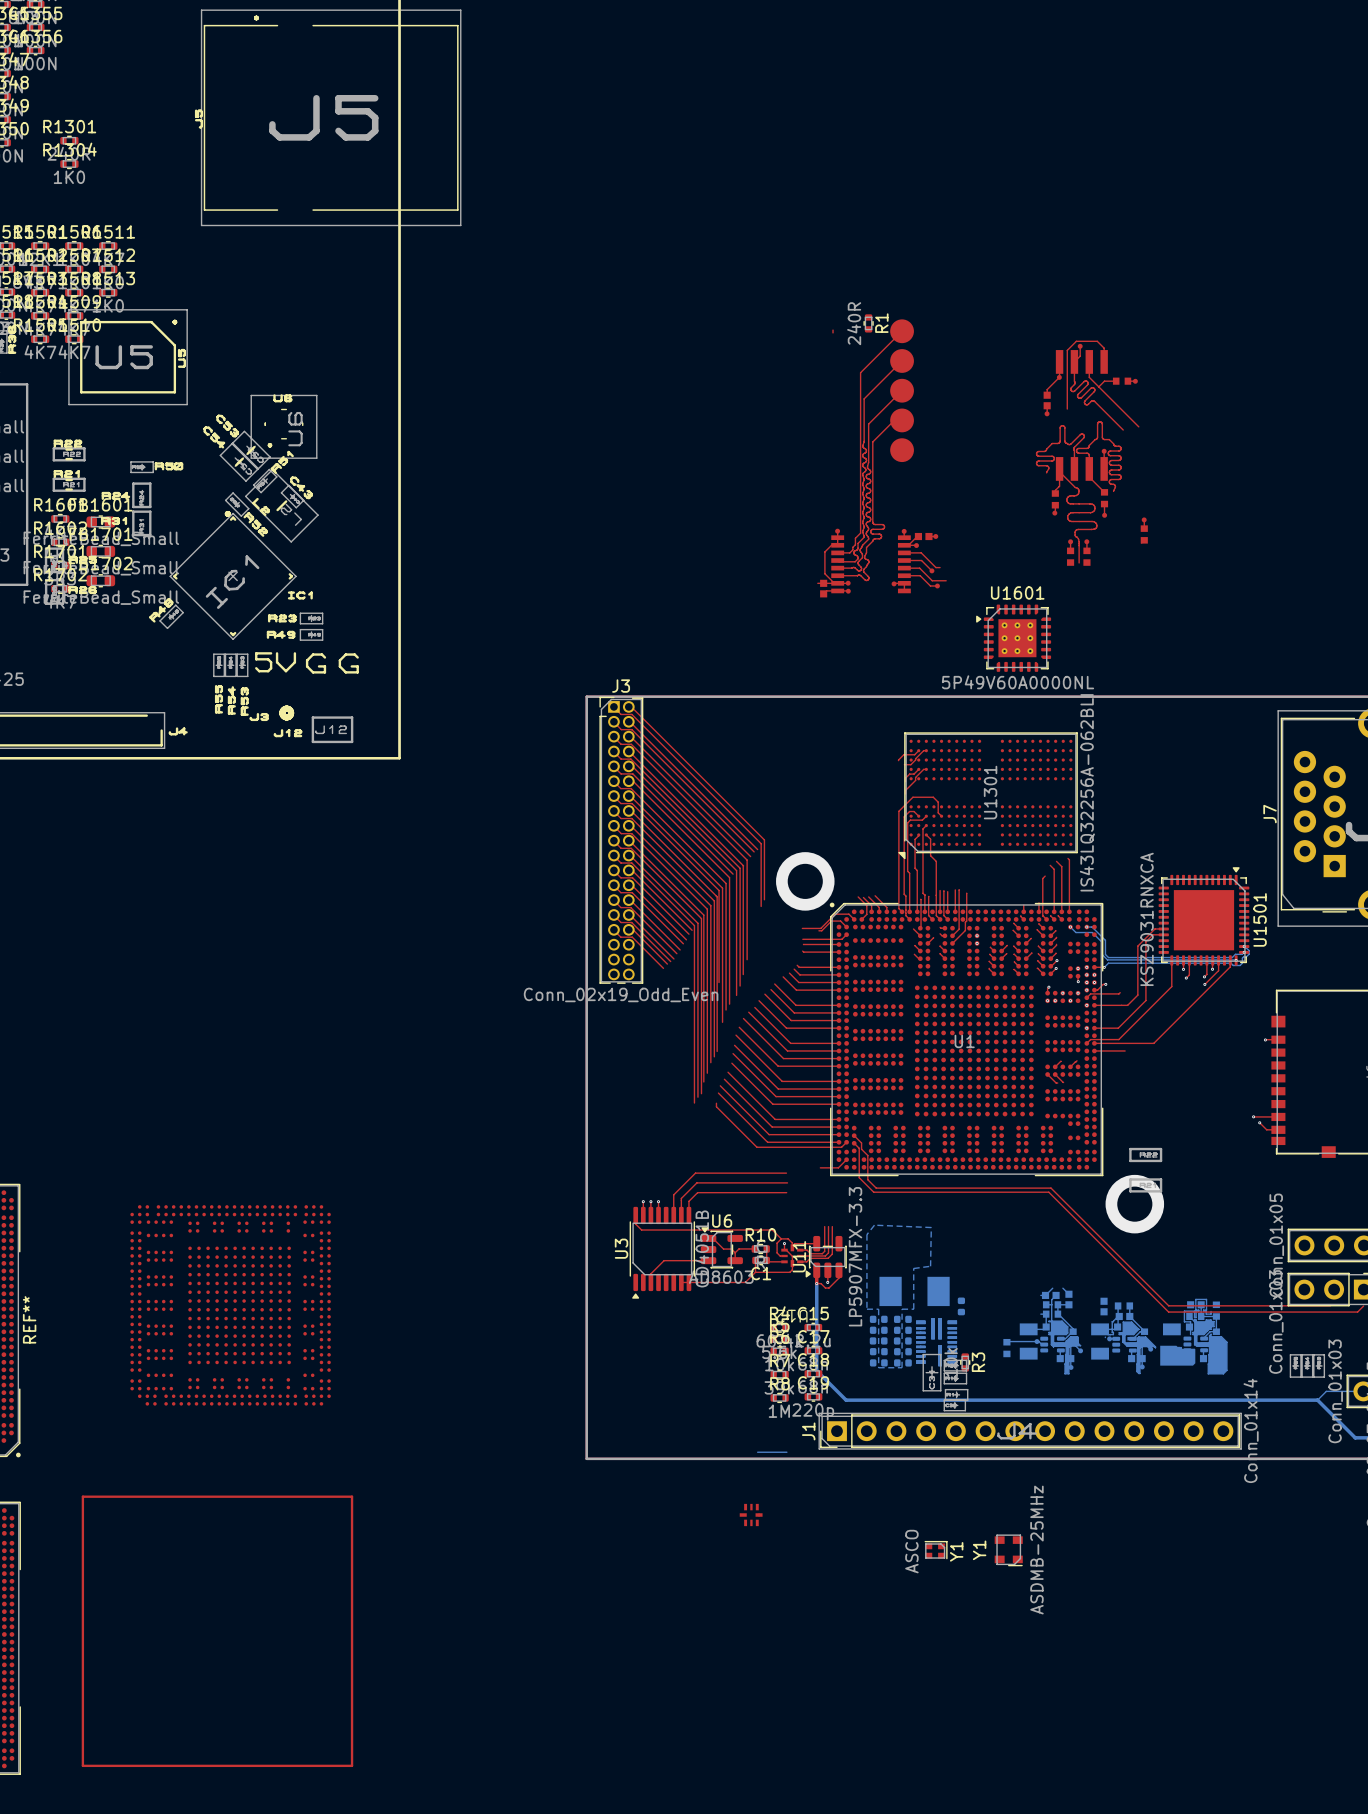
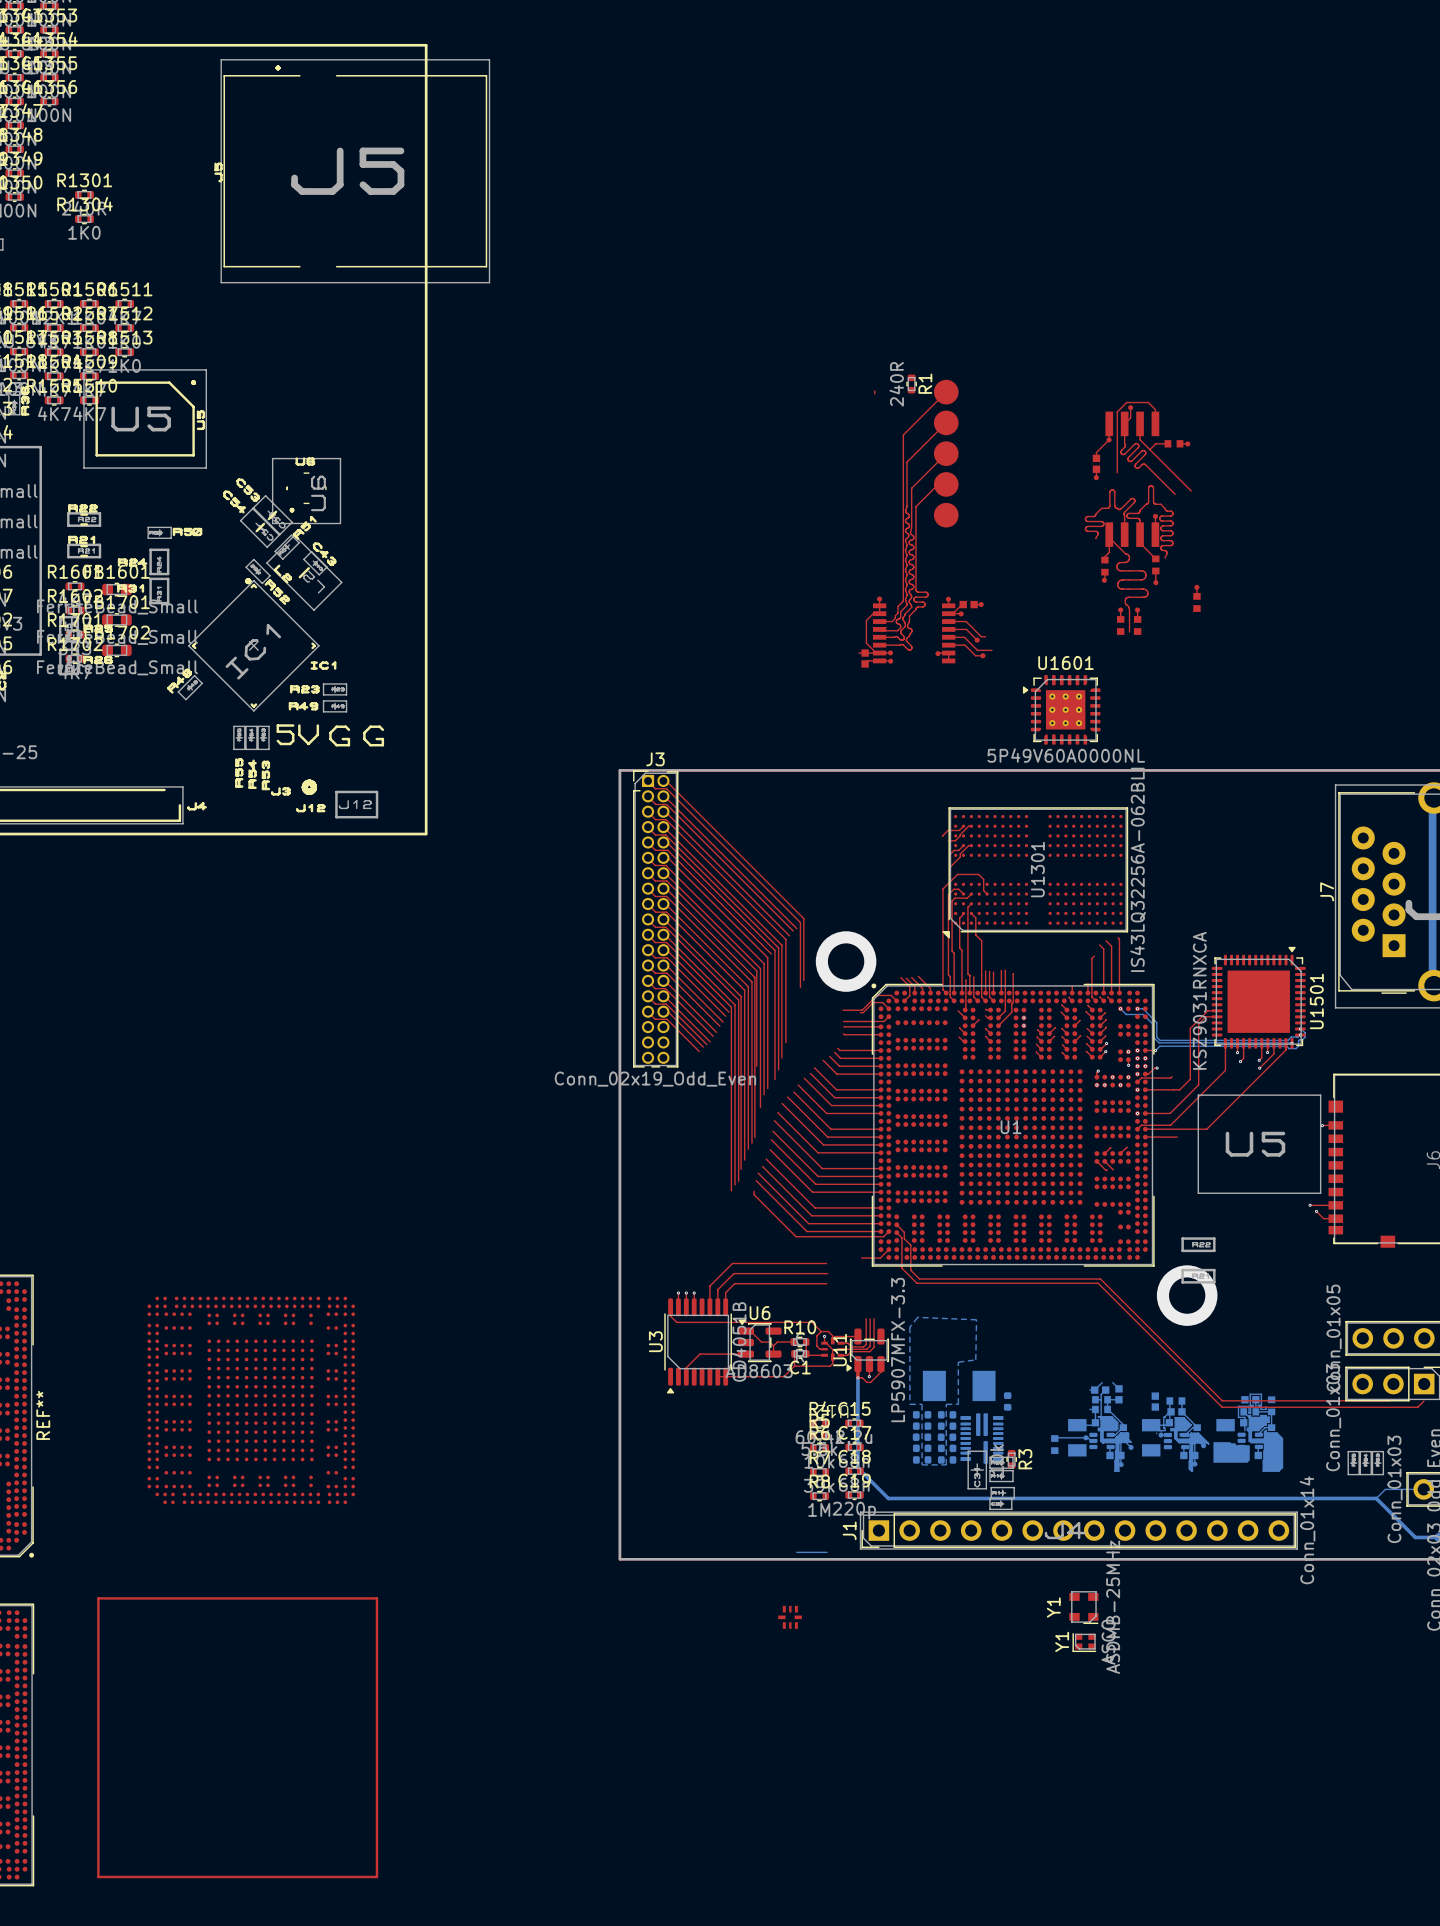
line: none -> (1198, 1095) (1198, 1193) (1320, 1193) (1320, 1095) (1198, 1095)
line: none -> (1227, 1133) (1227, 1151) (1231, 1154) (1247, 1154) (1251, 1151) (1251, 1133)
line: none -> (1283, 1133) (1263, 1133) (1263, 1140) (1279, 1140) (1283, 1144) (1283, 1151) (1279, 1154) (1267, 1154) (1263, 1151)
Y1 rotation: 0° (936, 1550) -> 180° (1084, 1642)
Y1 position: (936, 1550) -> (1084, 1642)
Y1 position: (1008, 1550) -> (1083, 1607)

